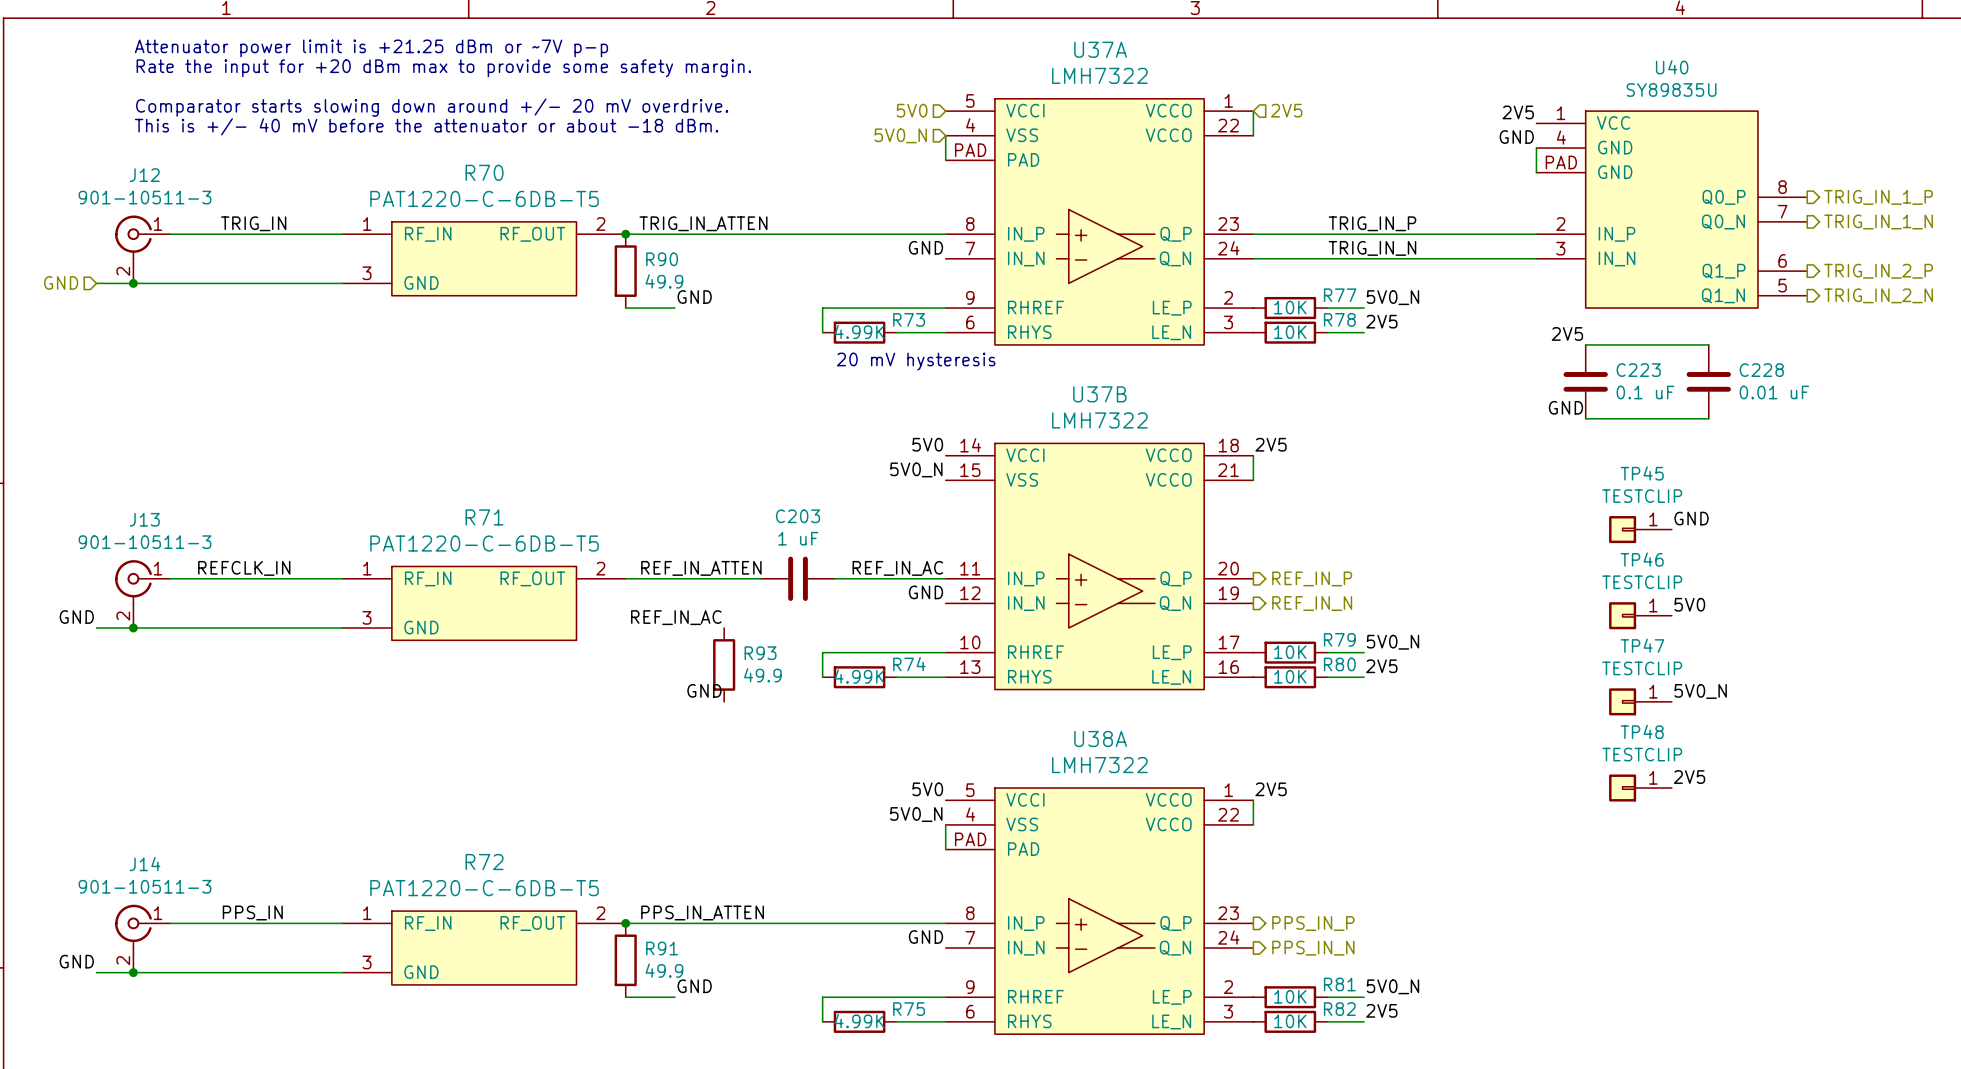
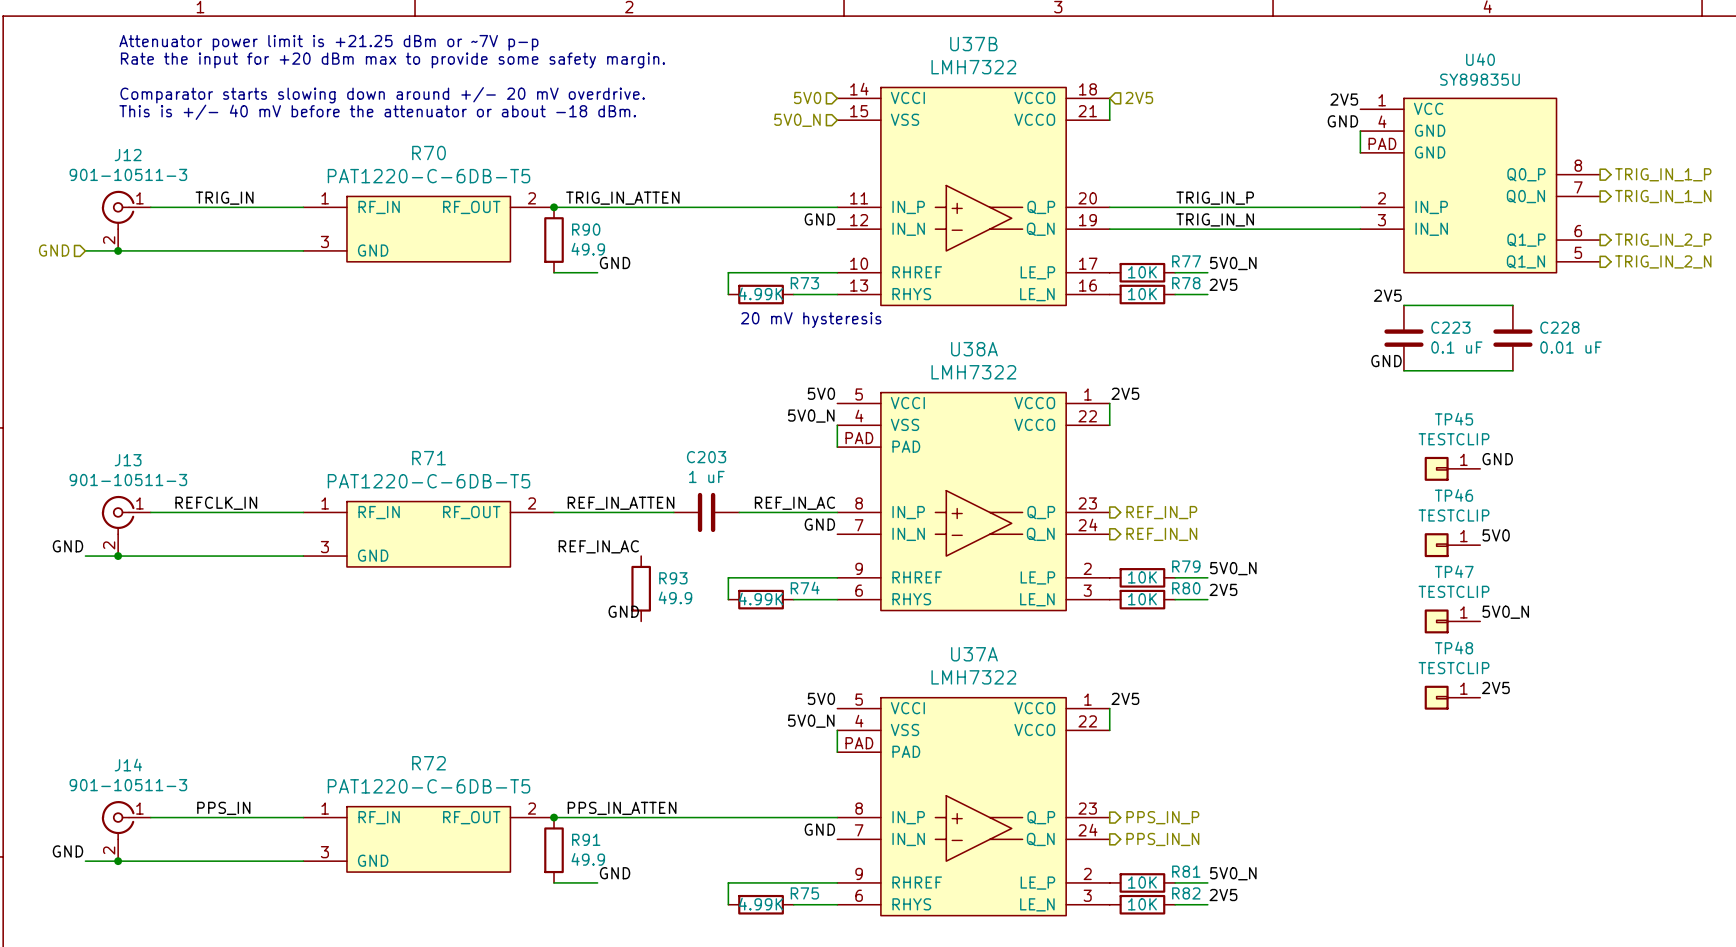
wire: (945, 135) (945, 160) -> none
U37A: LMH7322 (1099, 221) -> none
wire: none -> (837, 425) (837, 447)
U37B position: (1099, 566) -> (973, 196)
U38A: none -> LMH7322 (973, 501)
U38A name: U38A (1100, 738) -> U37A (974, 654)

